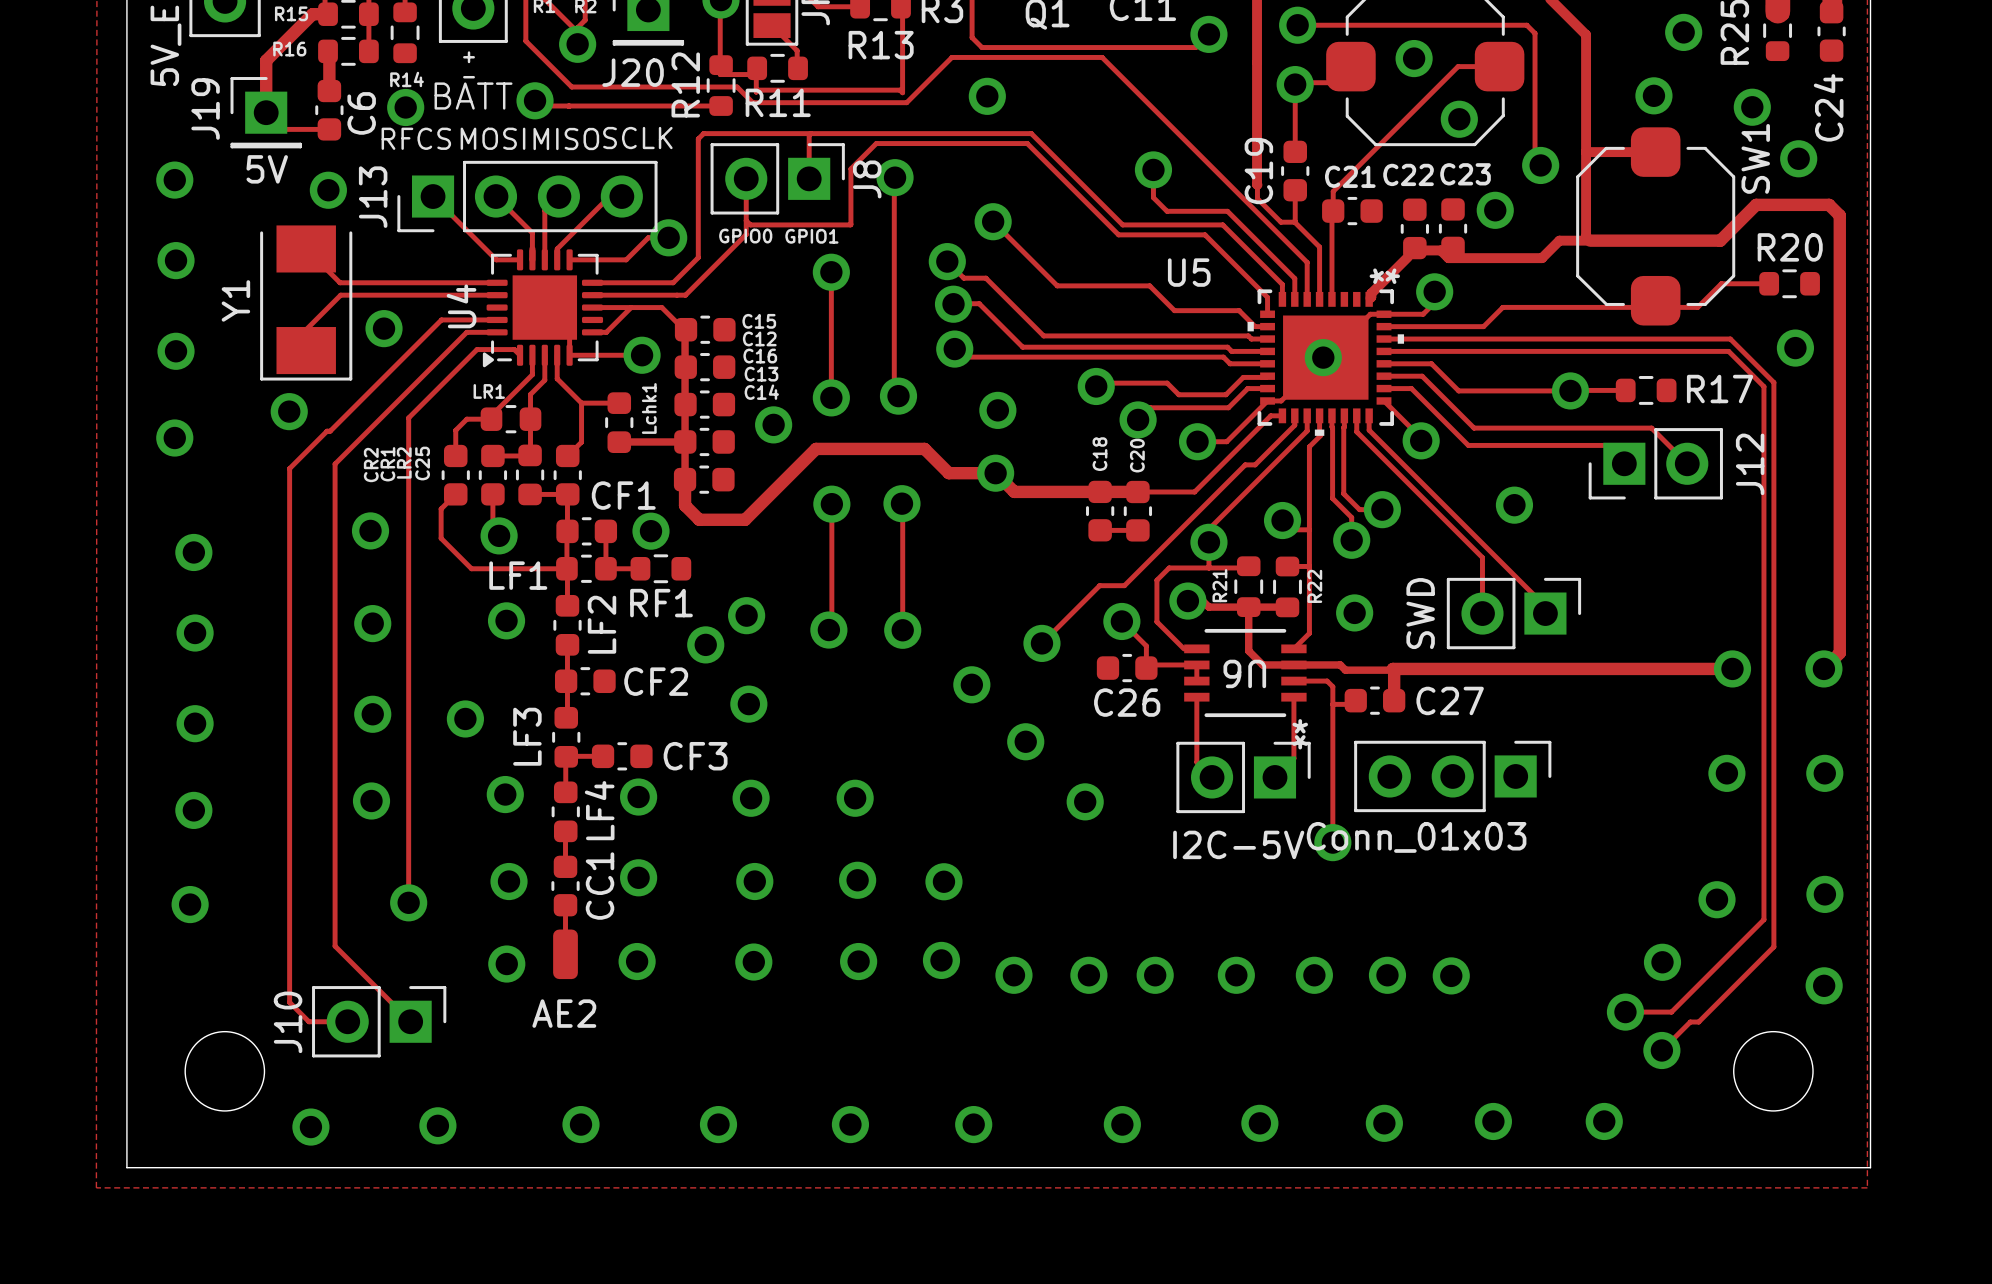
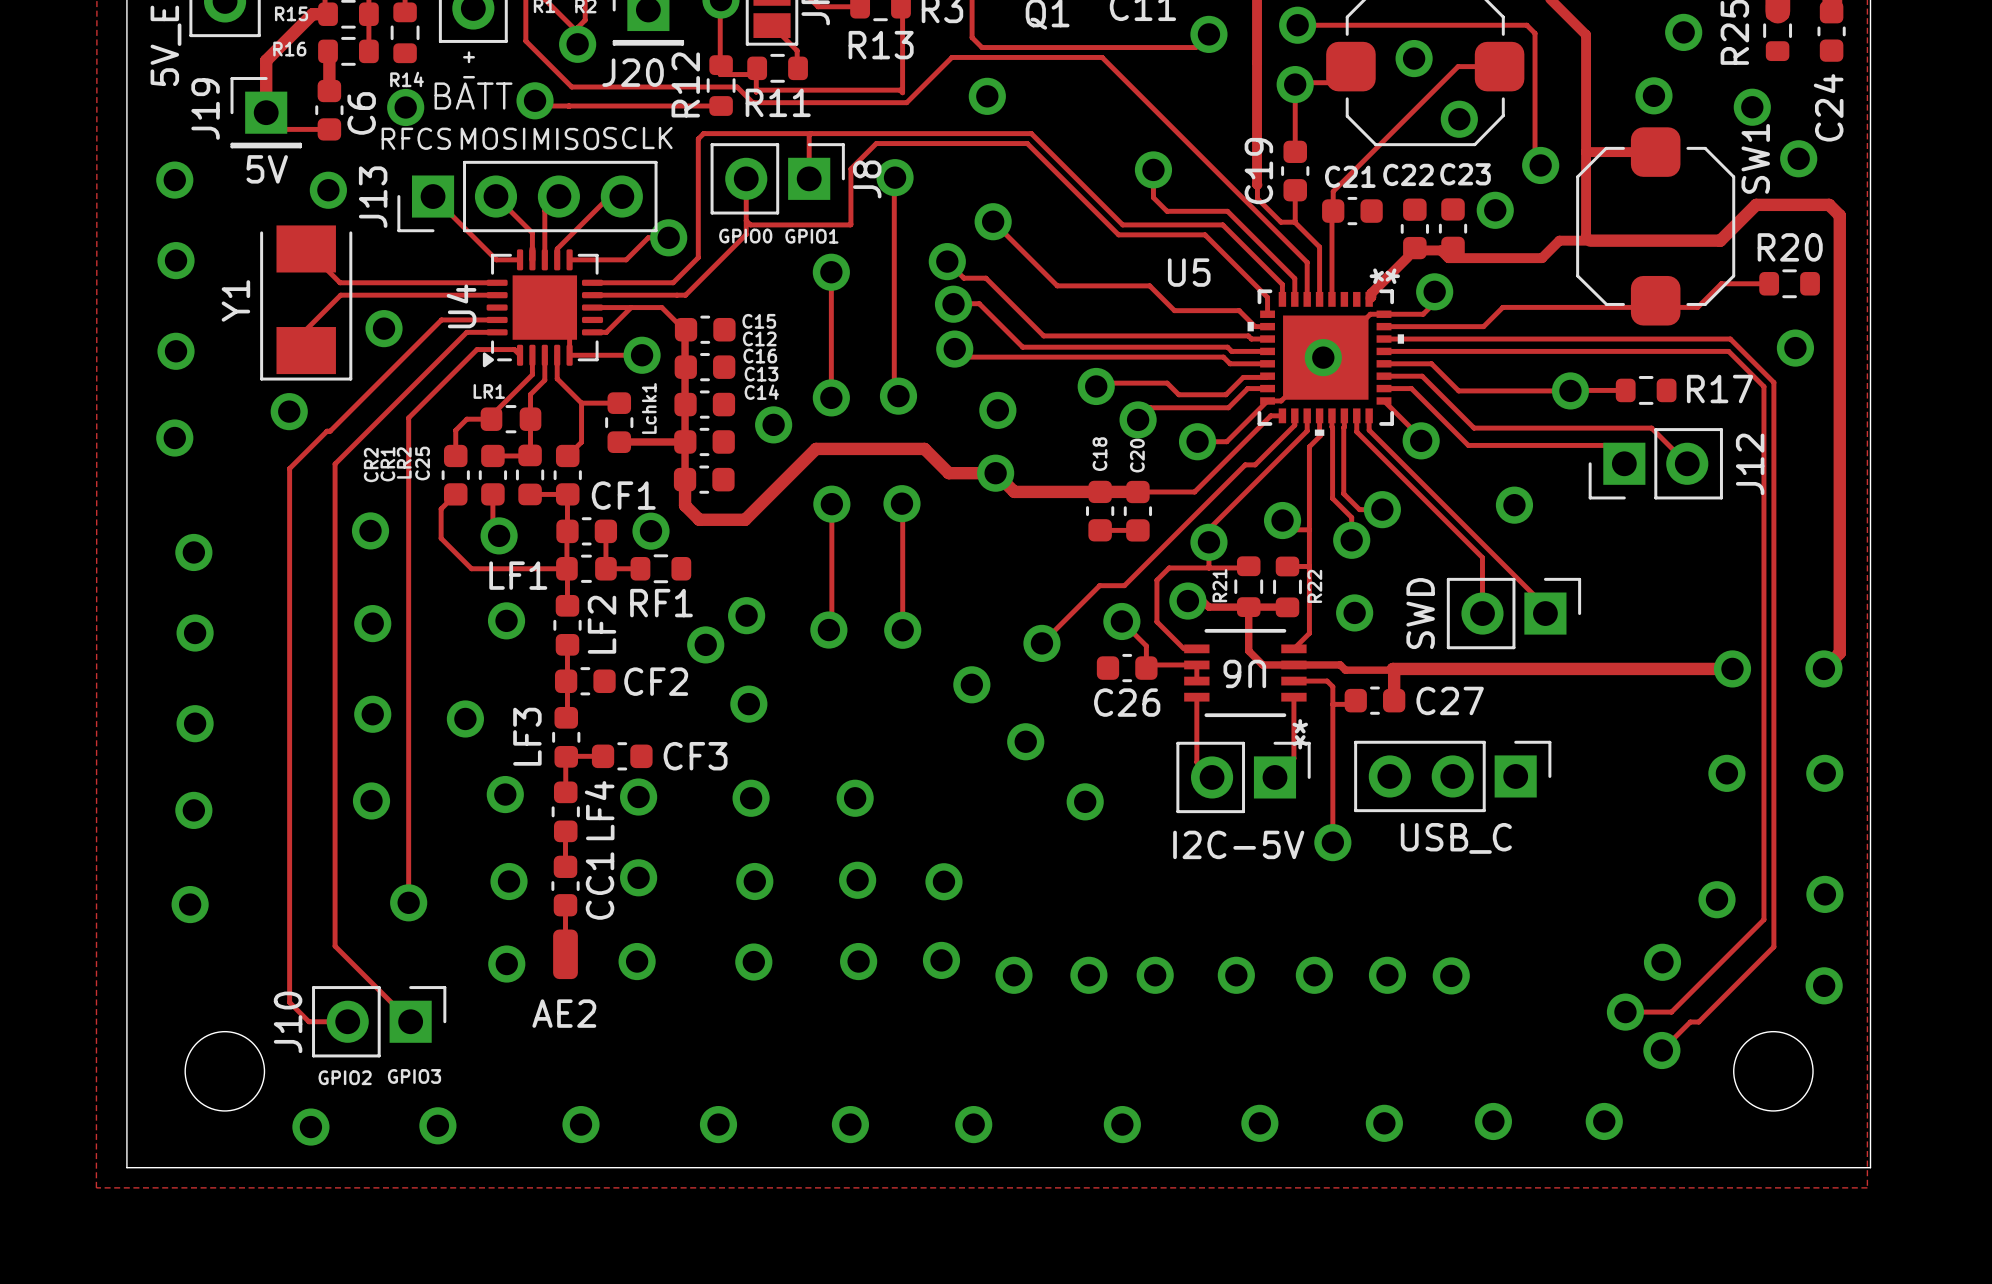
part value: Conn_01x03 (1416, 837) -> USB_C (1456, 838)
text: none -> GPIO3 (414, 1076)
text: none -> GPIO2 (345, 1077)

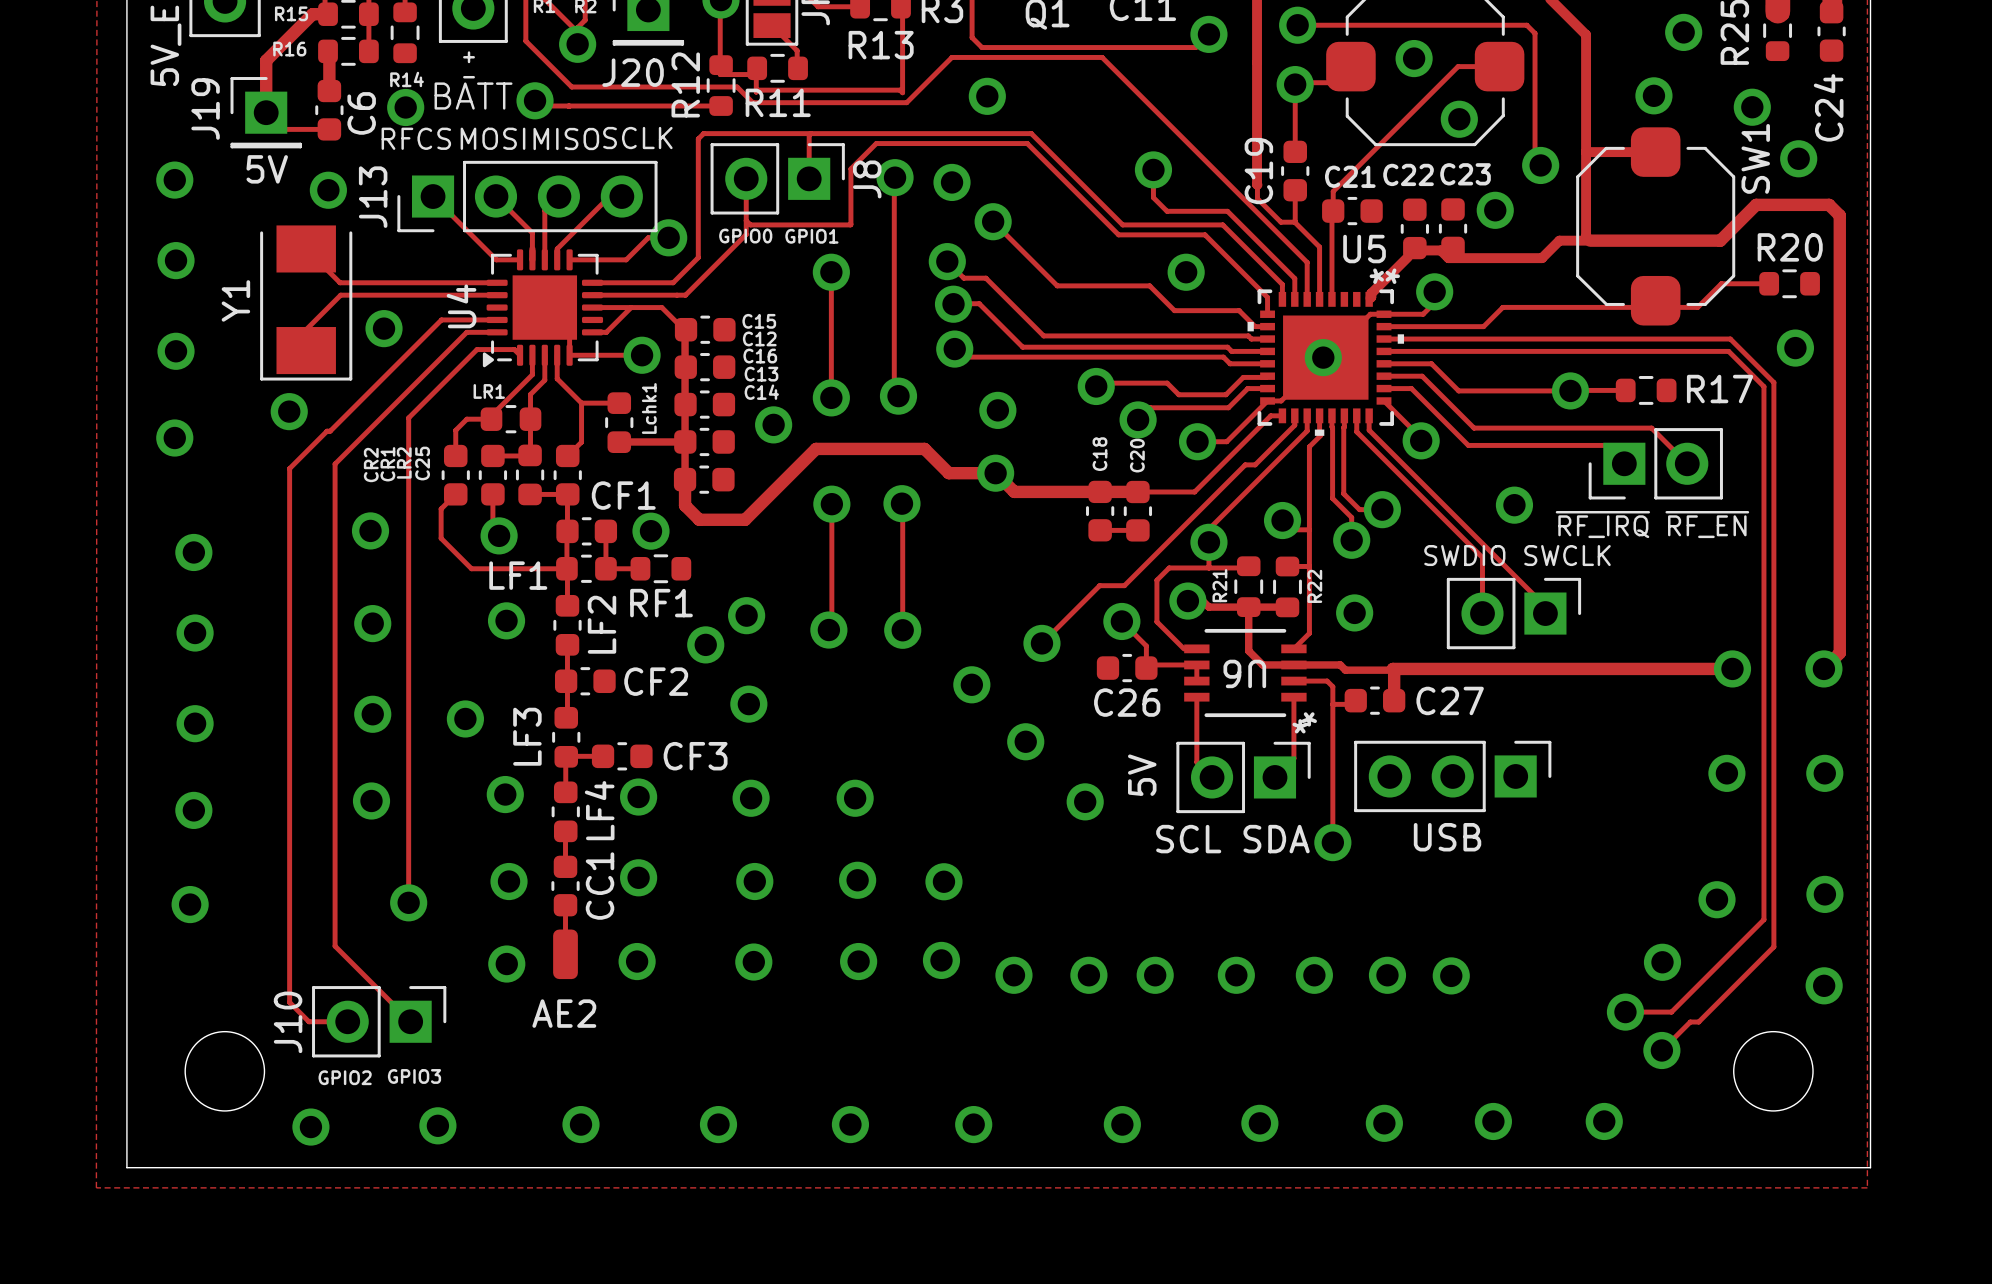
via: none -> (952, 182)
via: none -> (1186, 272)
U5 name position: U5 (1189, 272) -> U5 (1364, 249)
J12 name: J12 (1750, 464) -> none
text: none -> ~{RF_IRQ} ~{RF_EN} (1652, 524)
text: none -> SWDIO SWCLK (1517, 555)
part value: SWD (1420, 613) -> none
U6 footprint: [1184, 628, 1307, 718] -> [1184, 628, 1307, 718]
text: none -> 5V (1142, 775)
part value: USB_C (1456, 838) -> USB (1447, 837)
text: none -> SCL SDA (1232, 839)
part value: I2C-5V (1238, 844) -> none

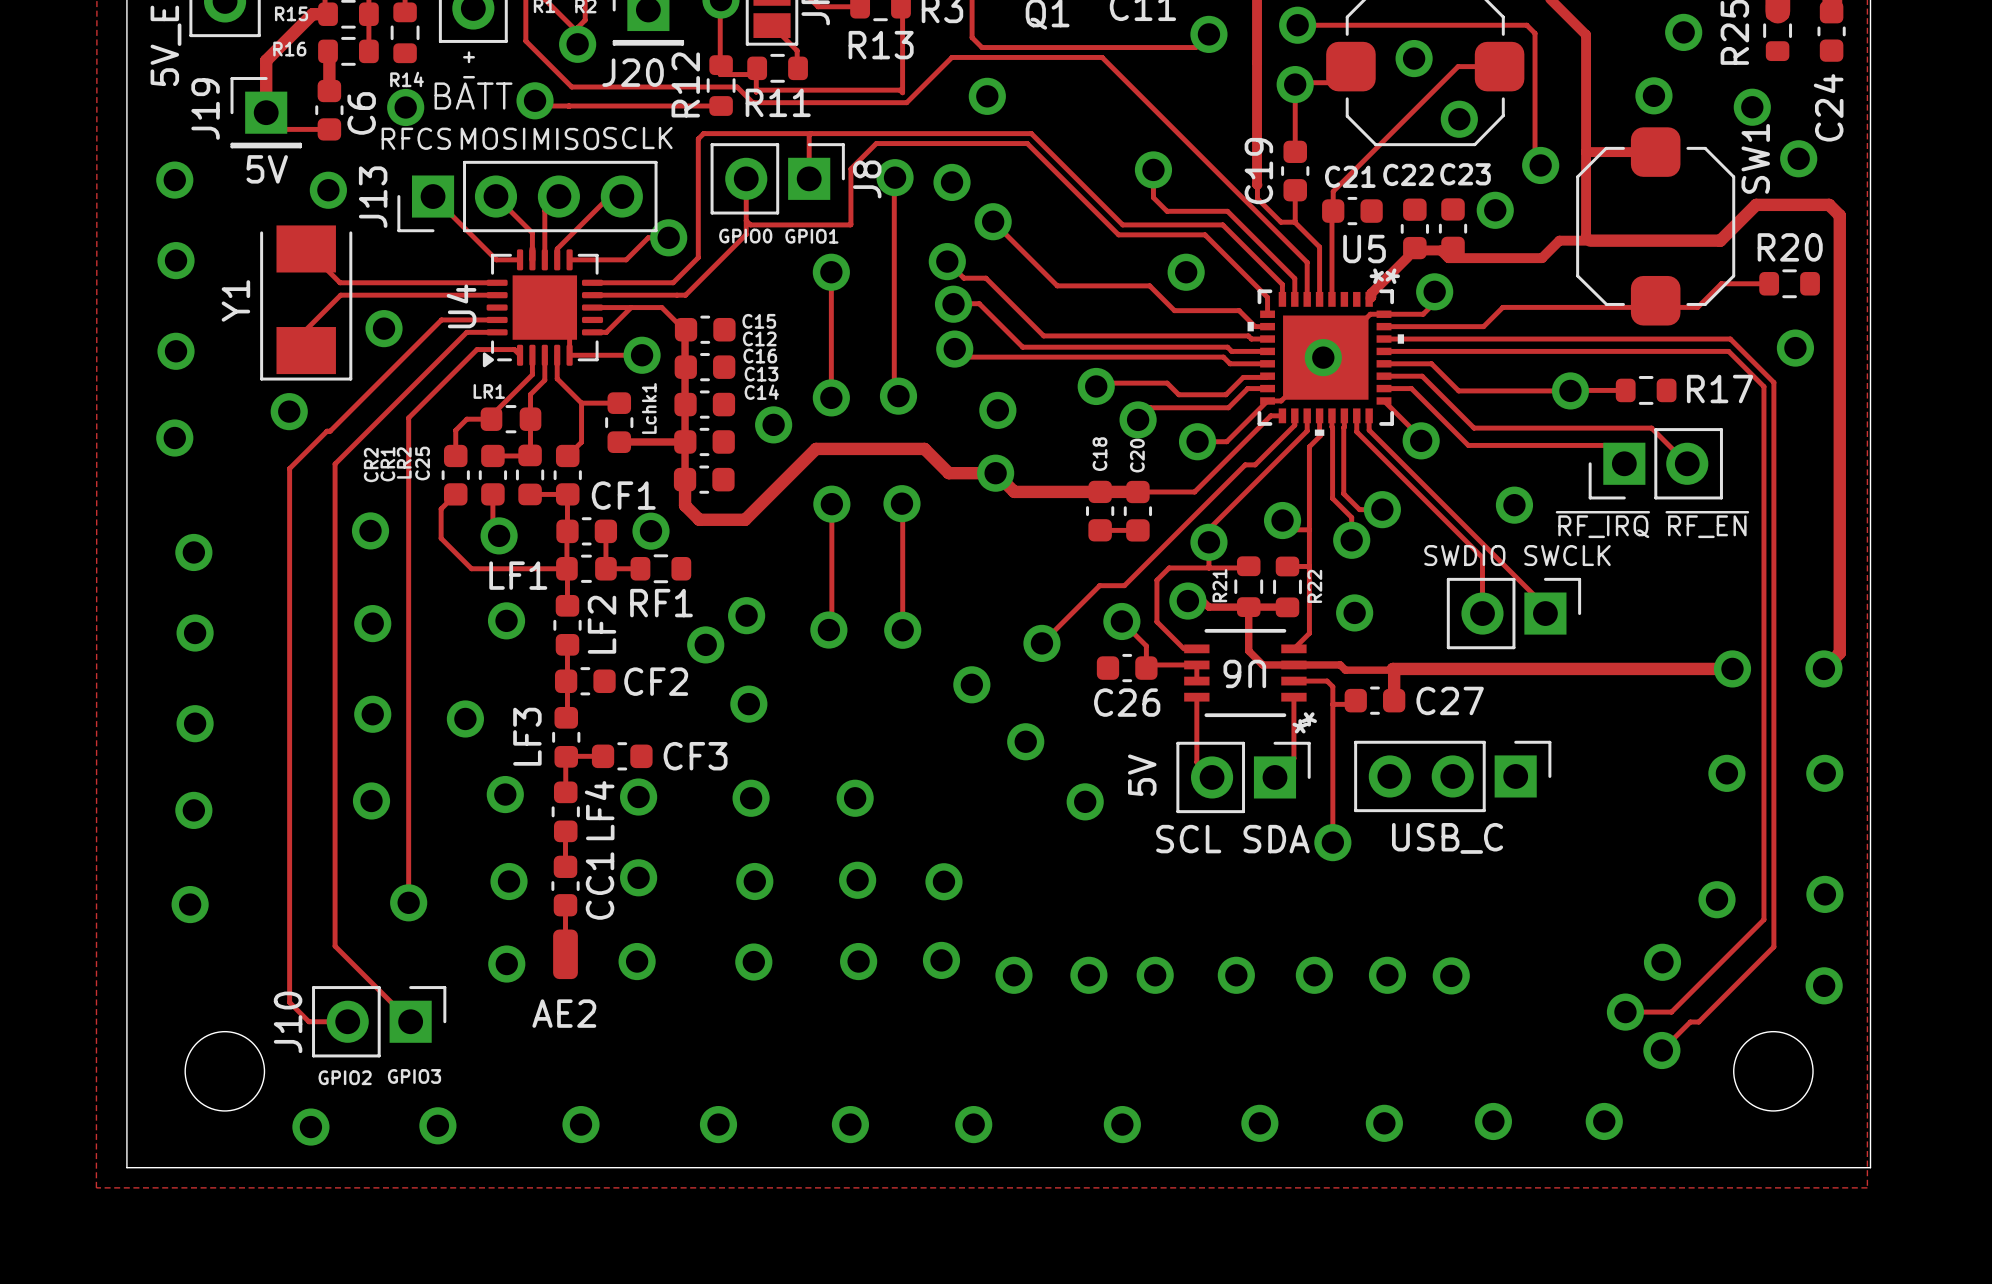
part value: USB (1447, 837) -> USB_C (1447, 838)

